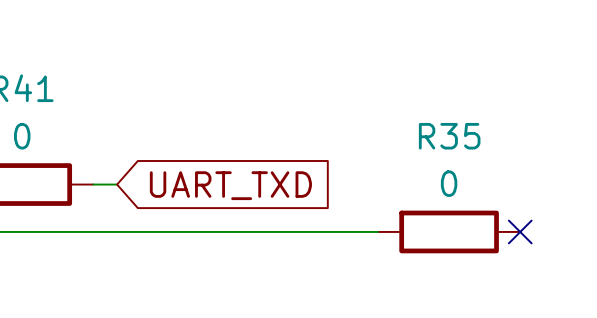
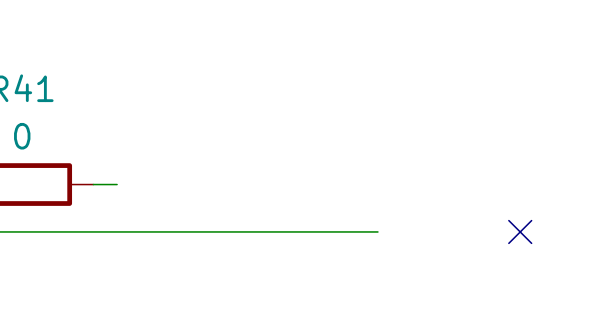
global label: UART_TXD (230, 185) -> none
R35: 0 (449, 231) -> none

